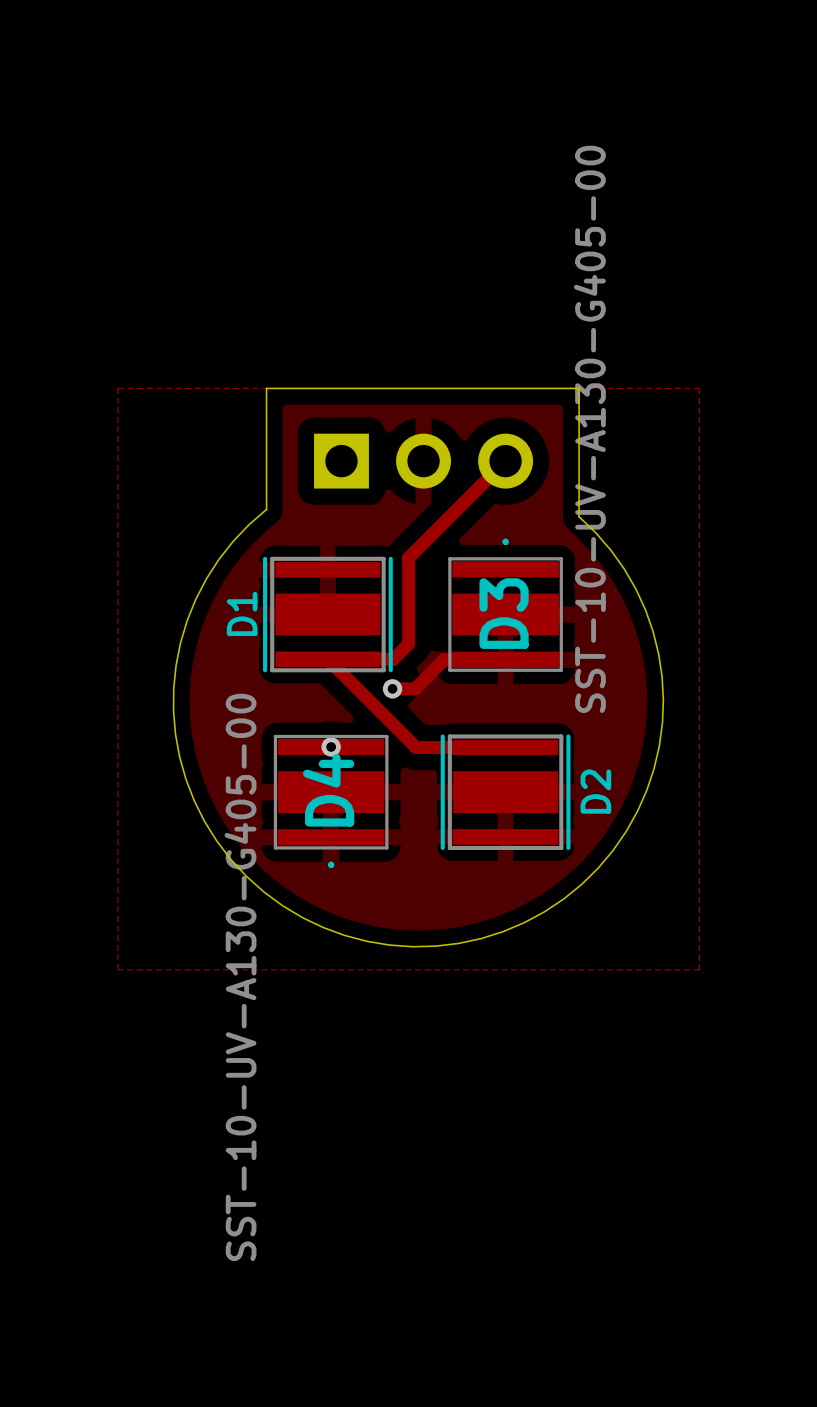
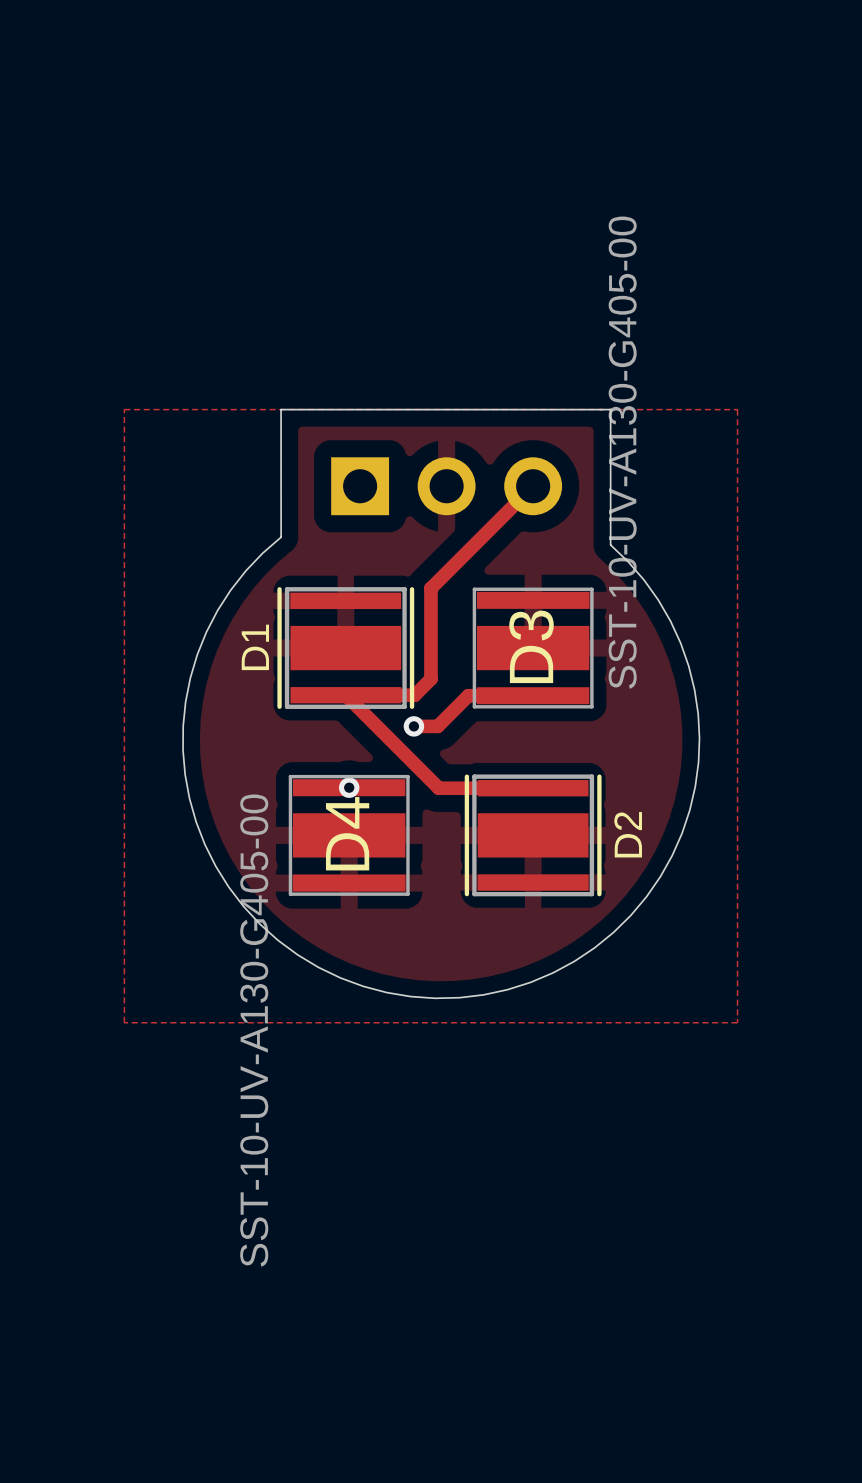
D3 footprint: [448, 538, 563, 672] -> [472, 587, 594, 709]
D4 footprint: [273, 734, 389, 869] -> [288, 774, 410, 896]

